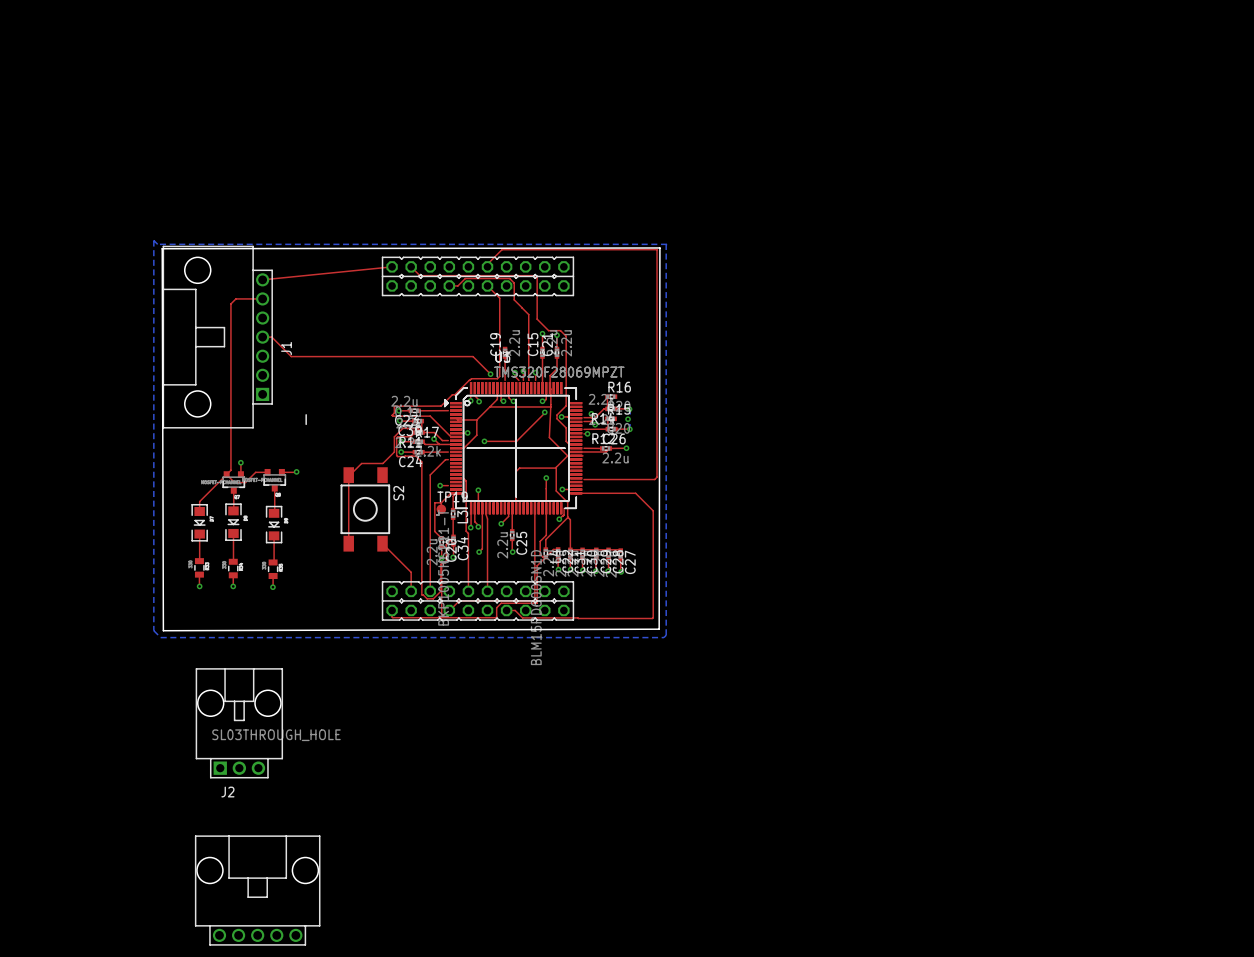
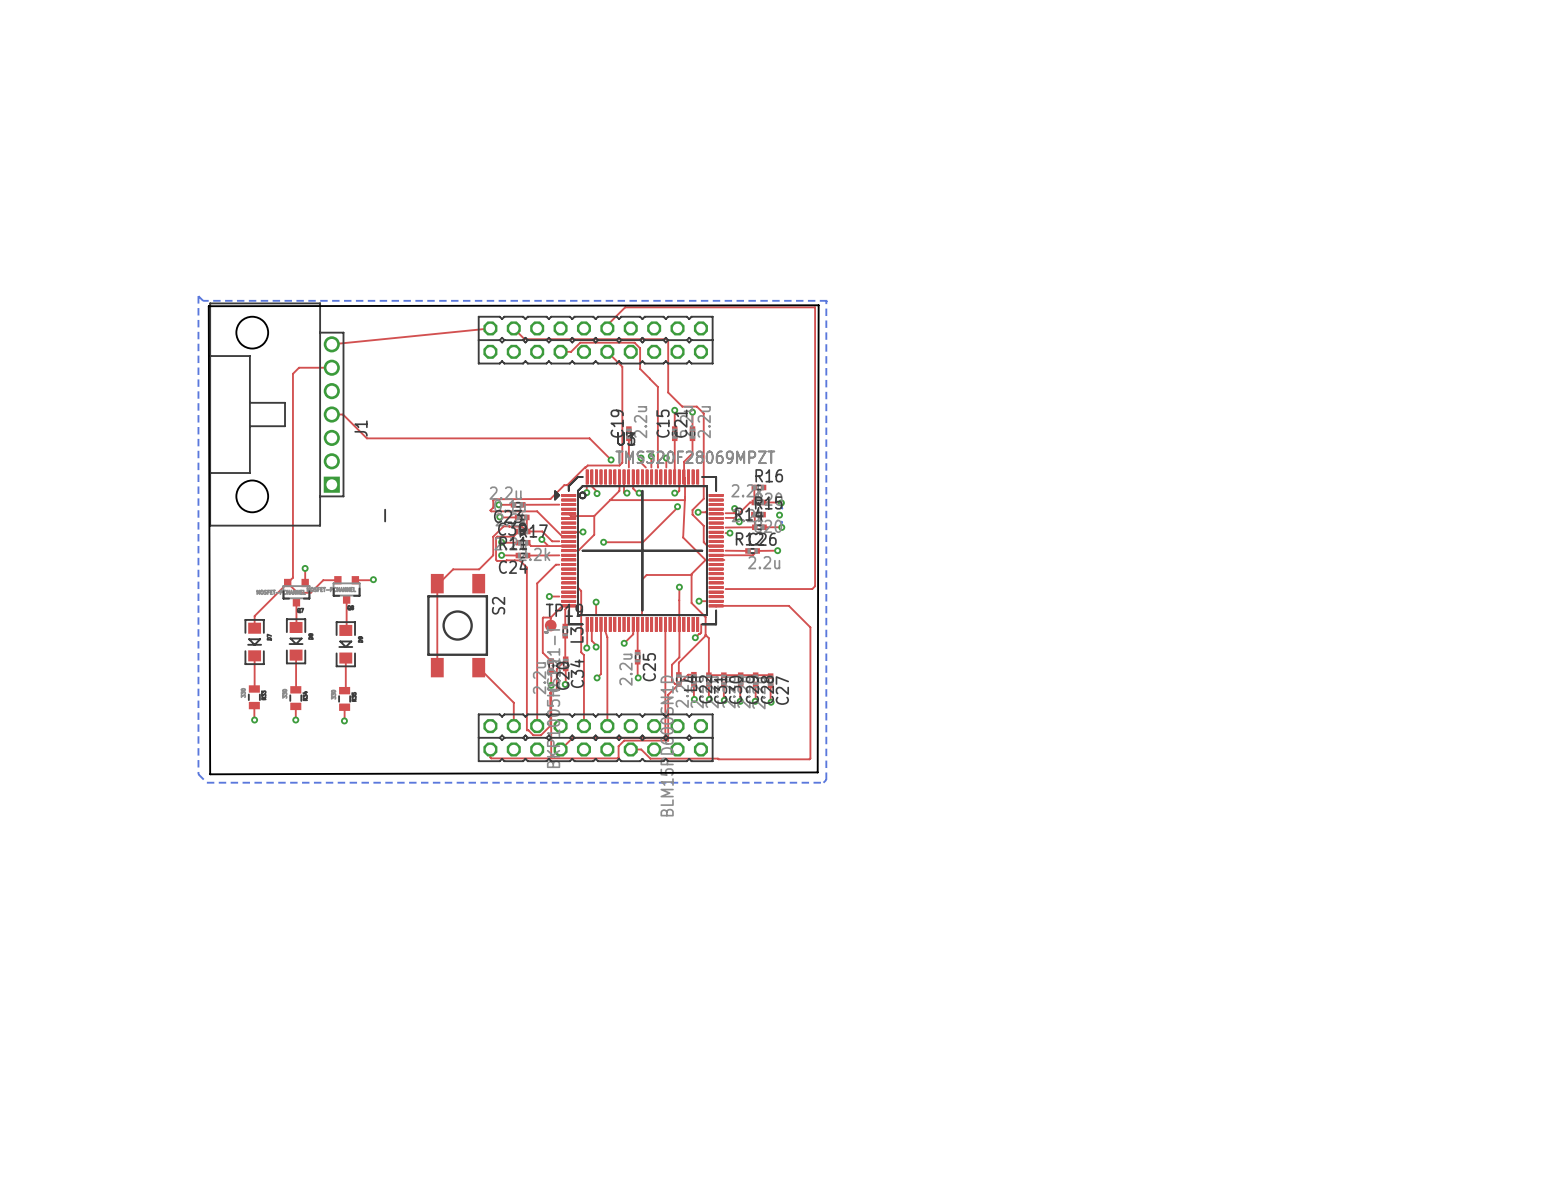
J2: SL03THROUGH_HOLE (239, 723) -> none
part: (257, 890) -> none

